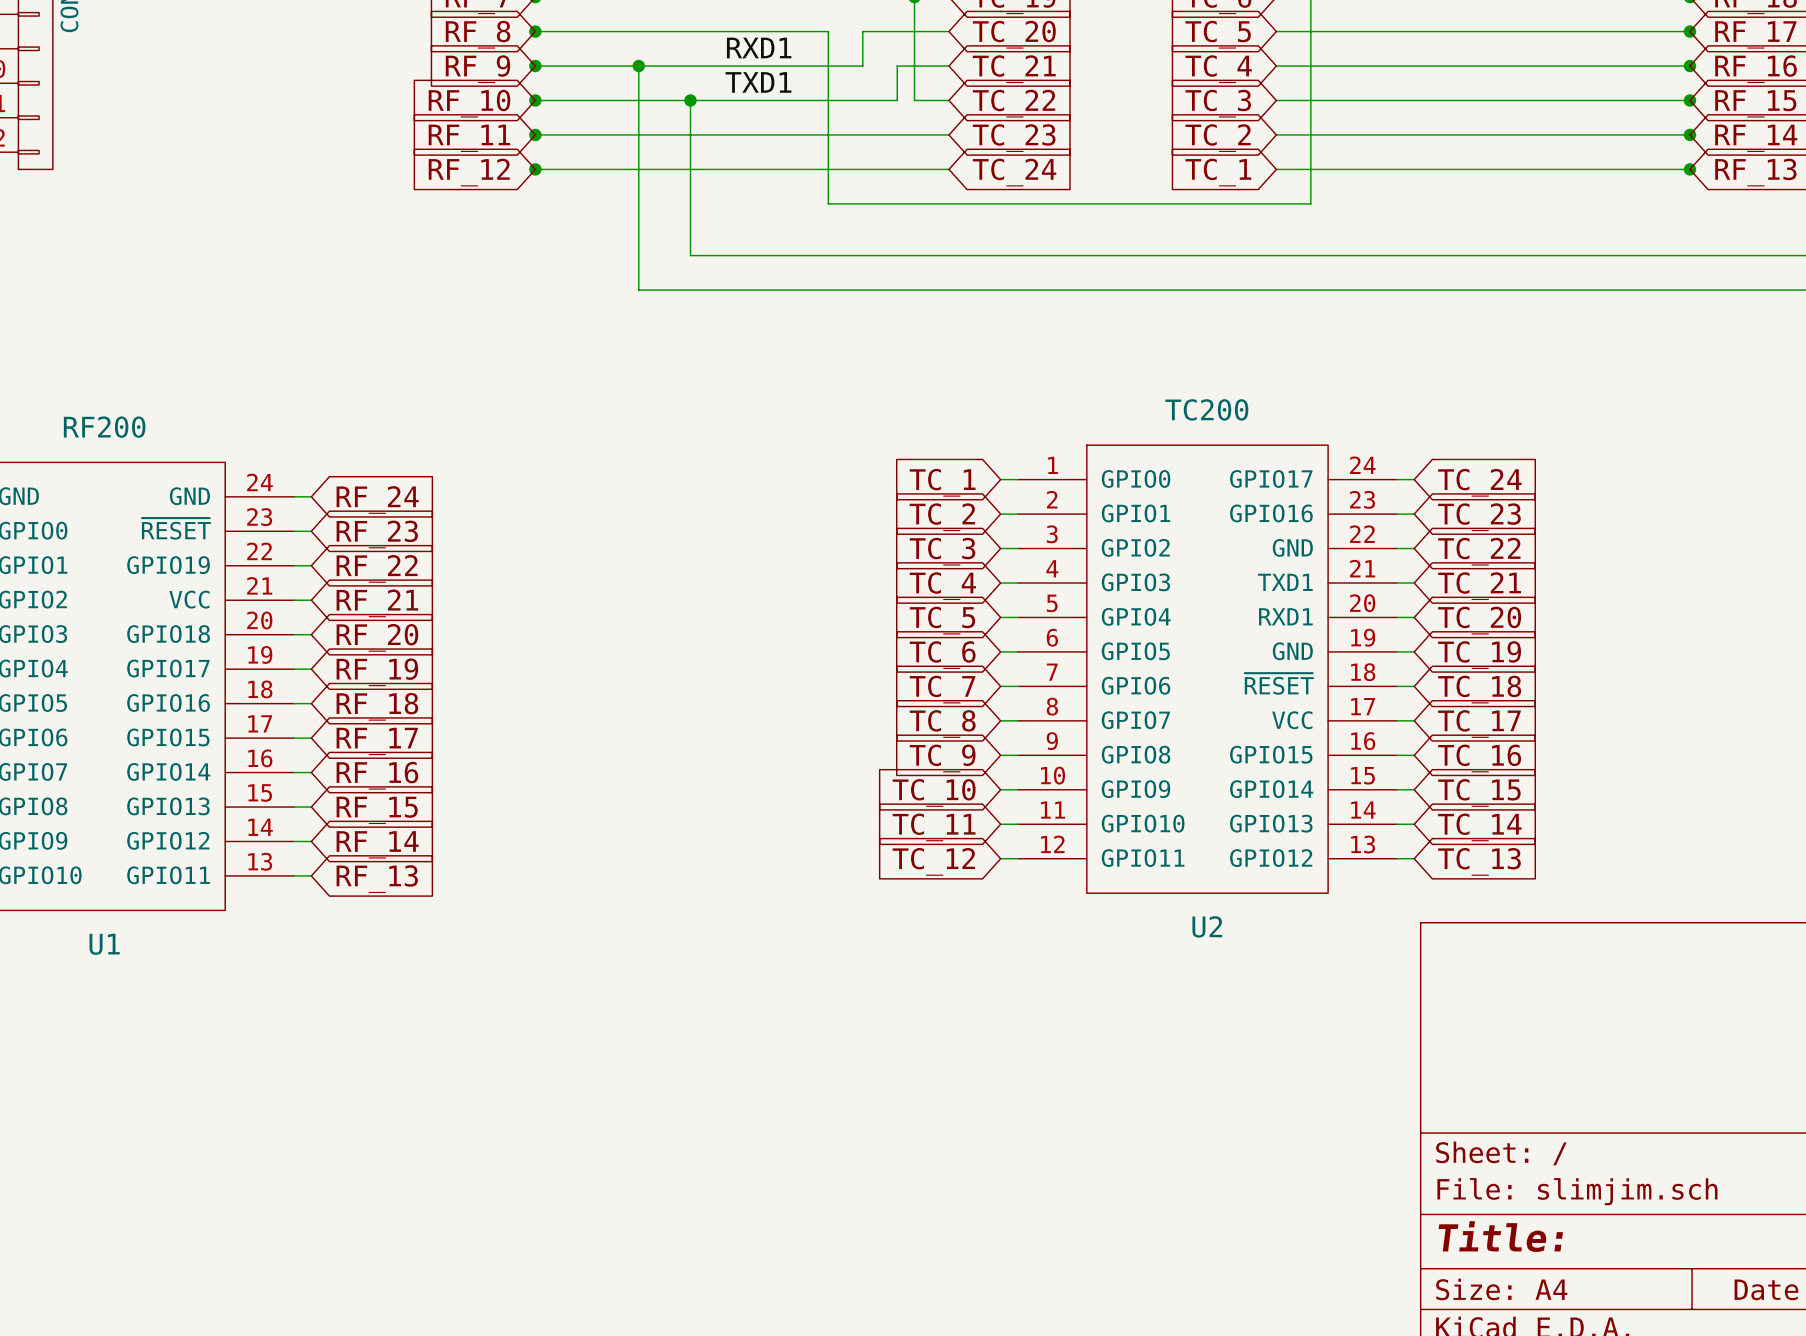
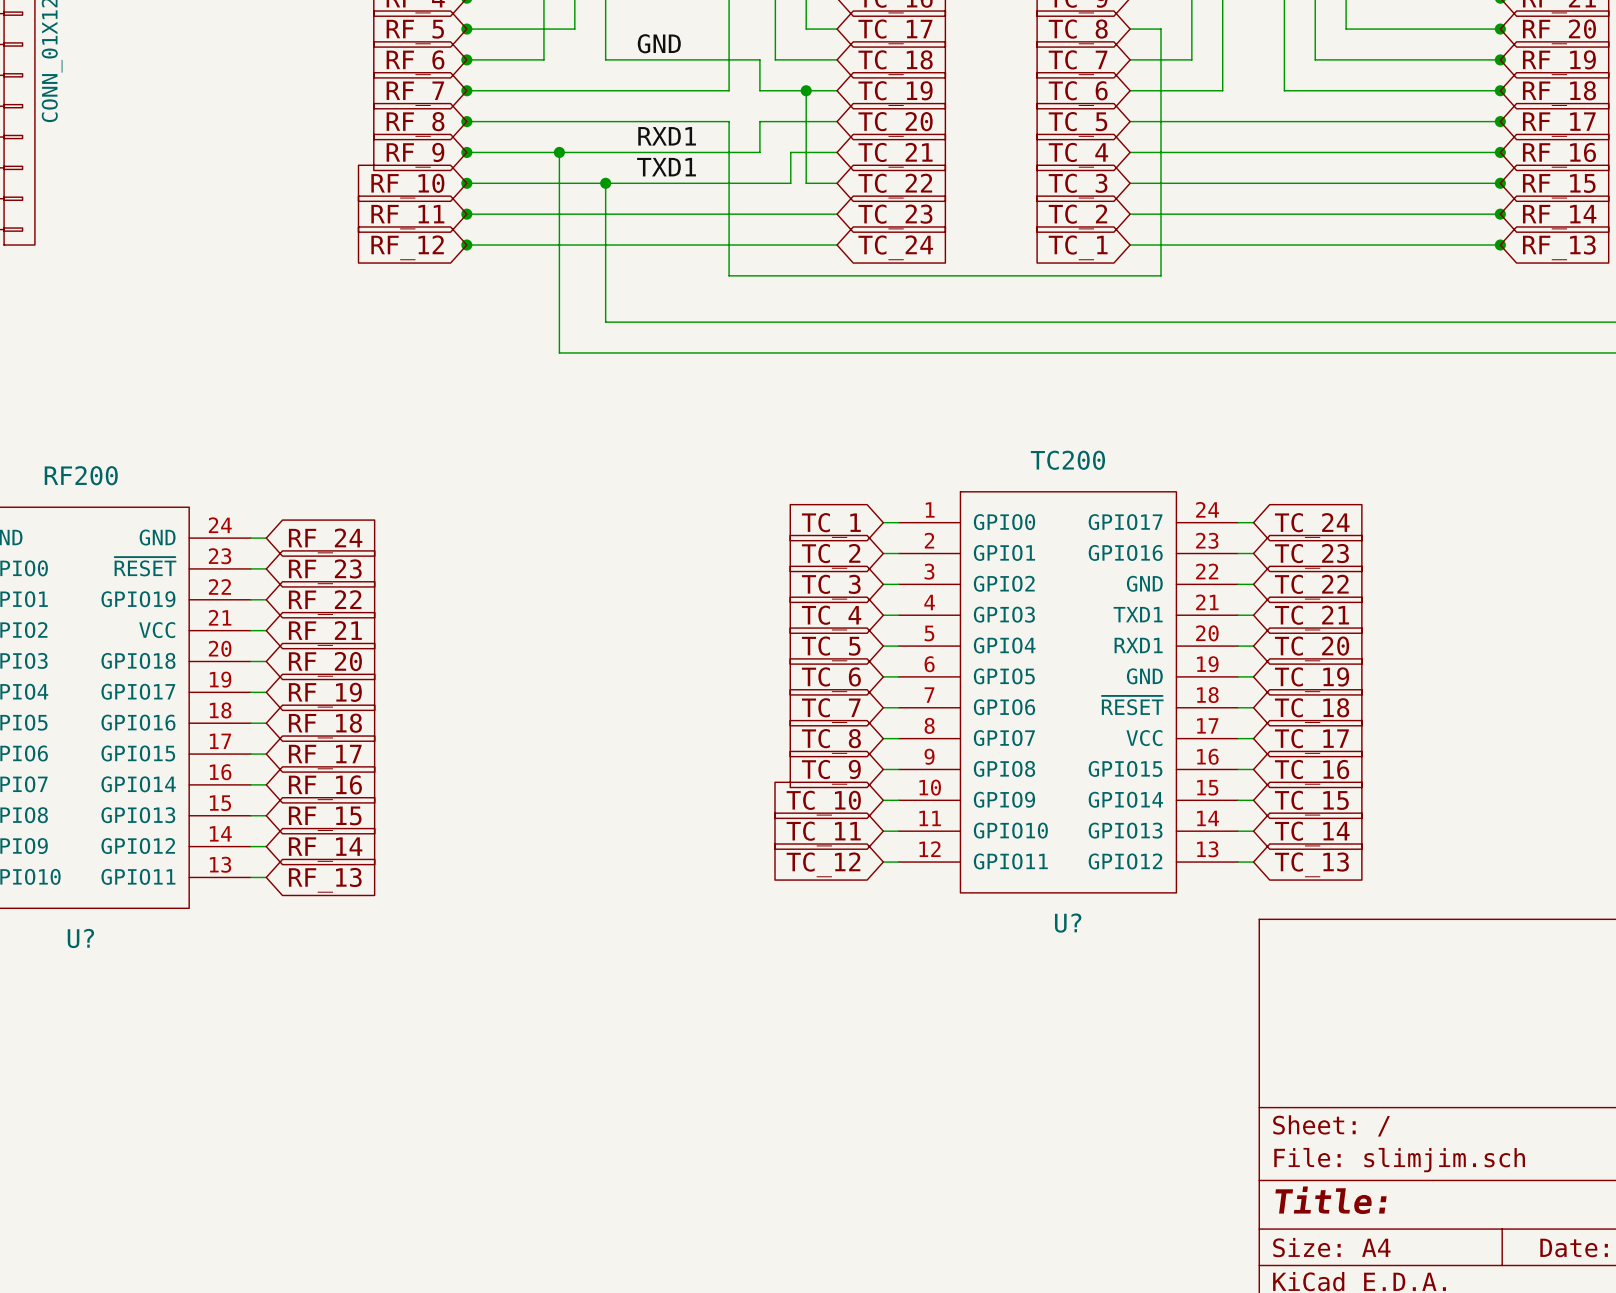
U2 name: U2 (1207, 926) -> U? (1068, 923)
U1 name: U1 (104, 944) -> U? (80, 938)

